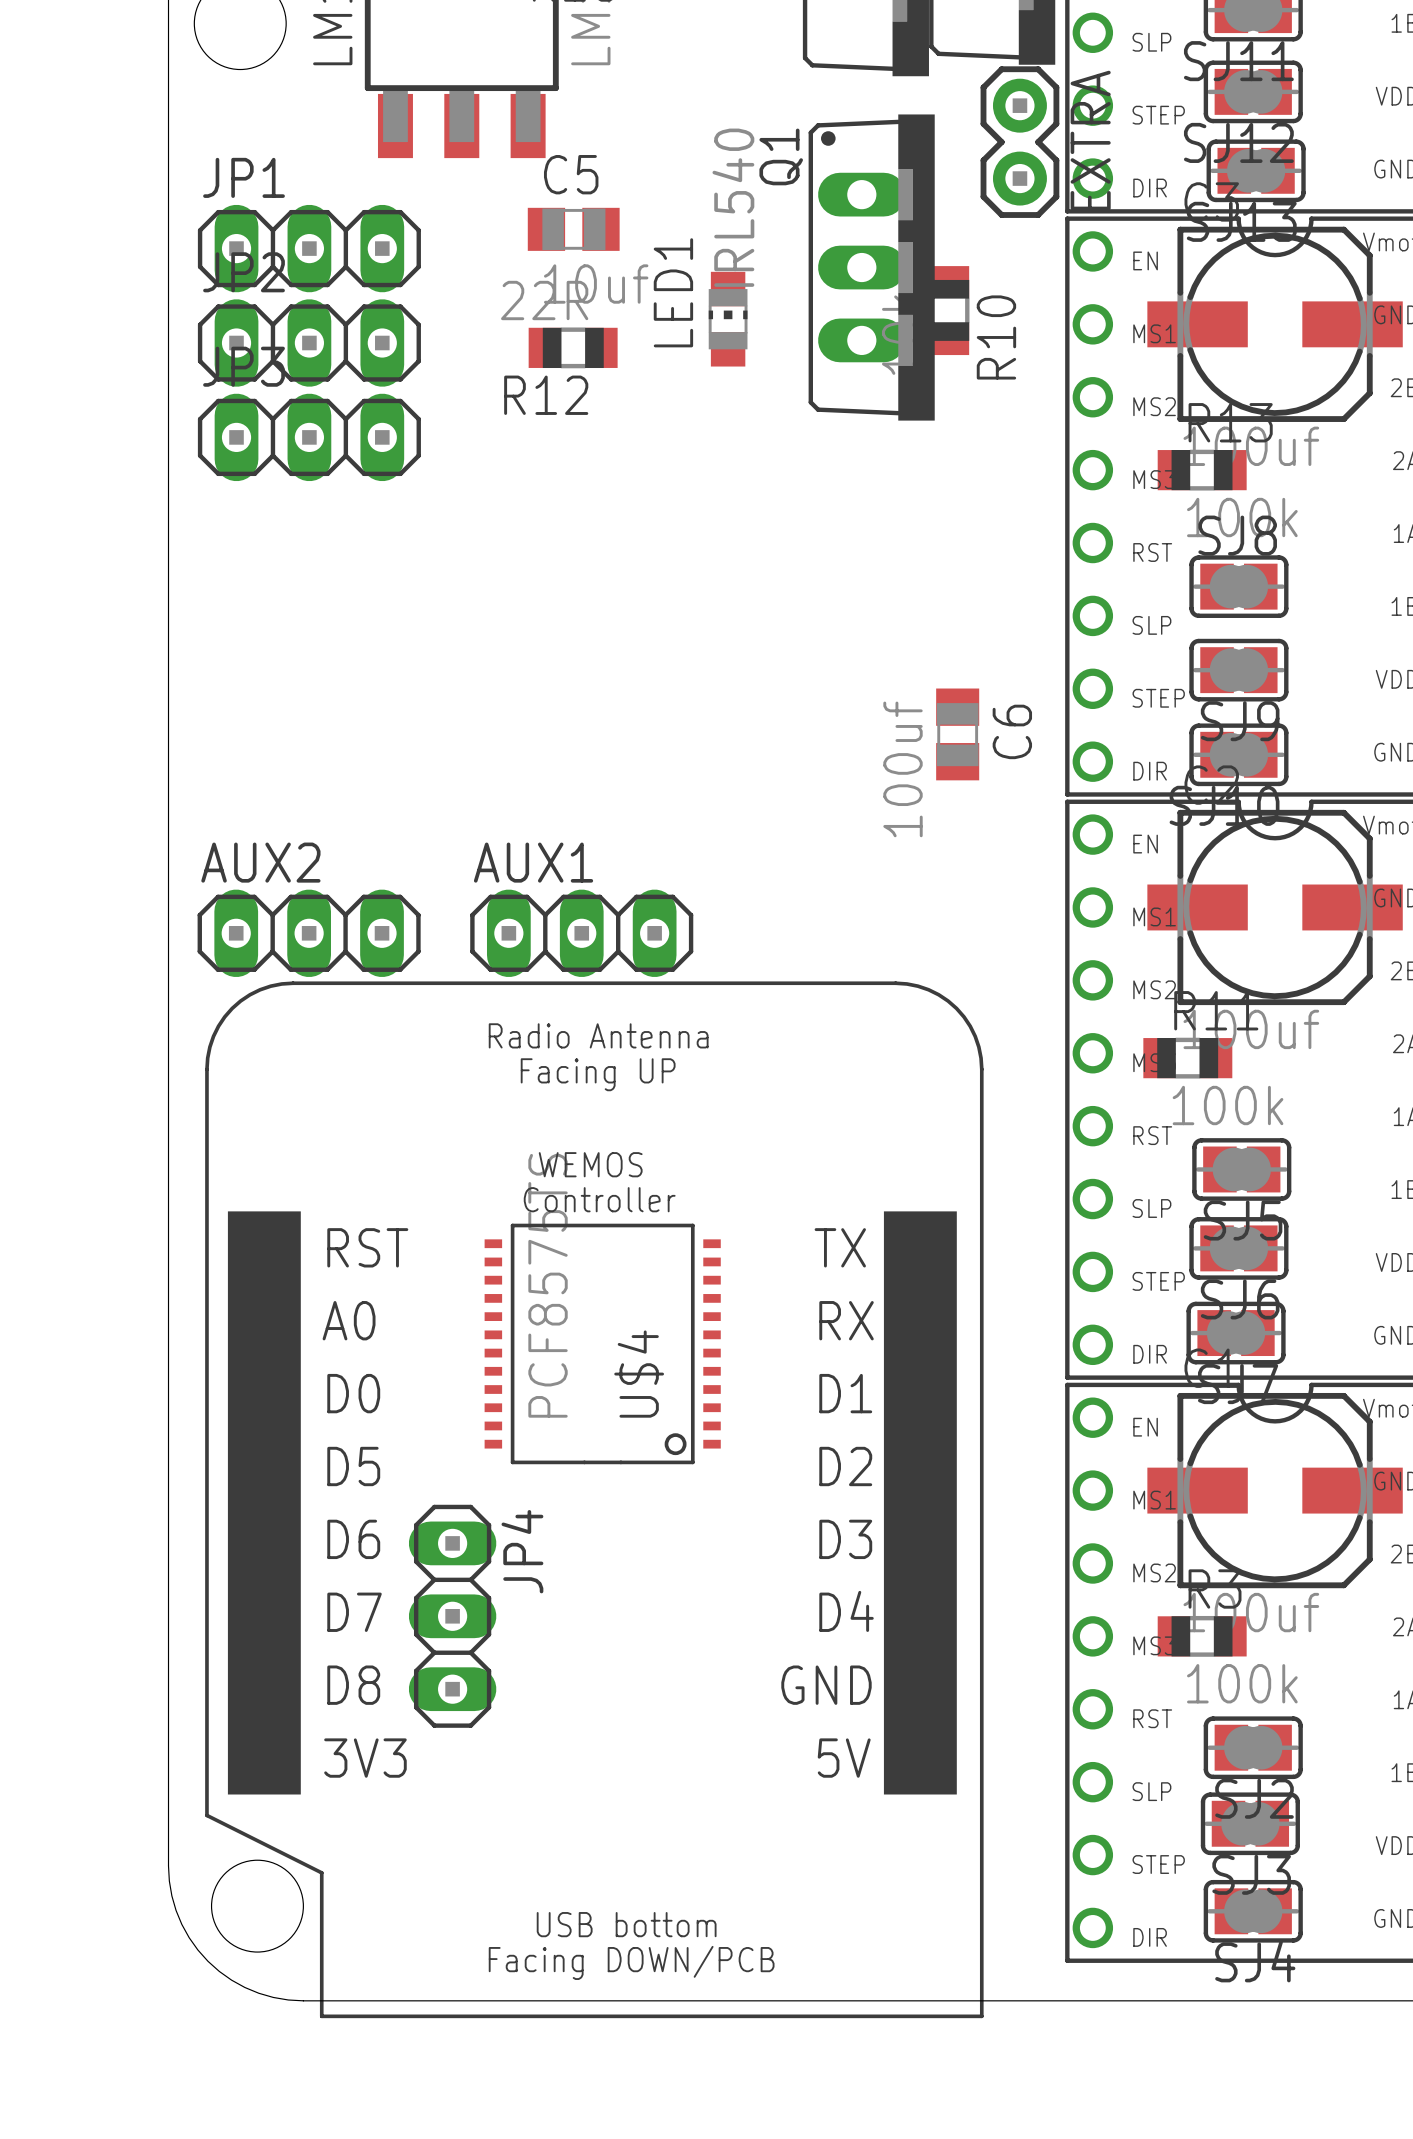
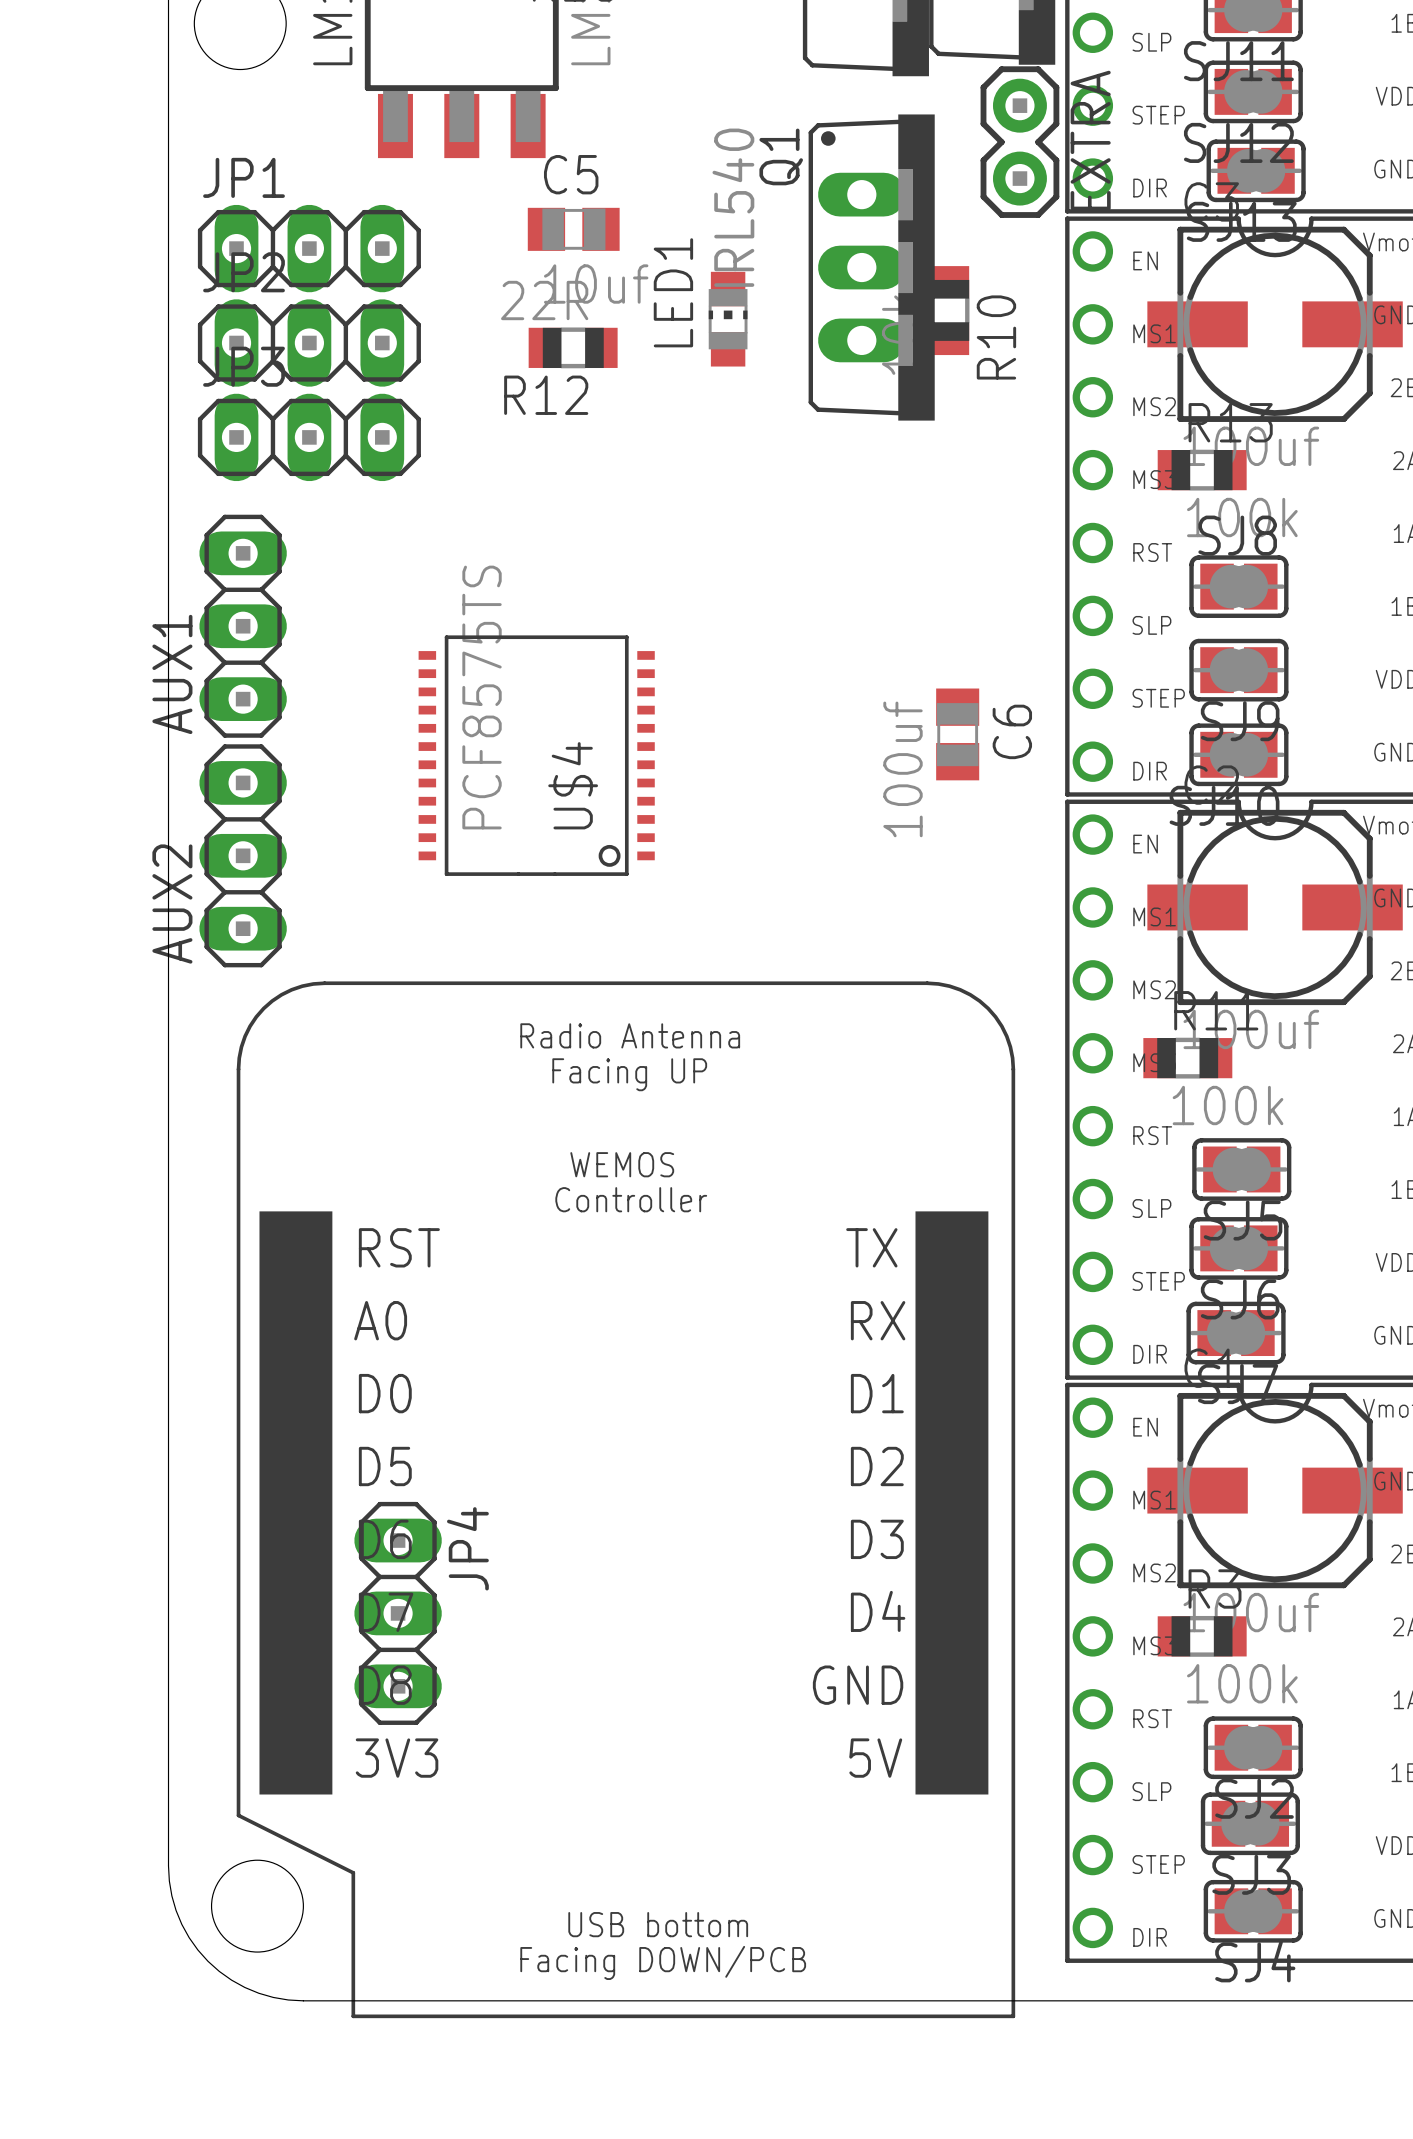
AUX2 name position: AUX2 (260, 862) -> AUX2 (172, 904)
AUX1 name position: AUX1 (533, 862) -> AUX1 (172, 674)
AUX2 rotation: 0° (309, 933) -> 90° clockwise (243, 855)
AUX1 rotation: 0° (581, 933) -> 90° clockwise (243, 626)
AUX1 position: (581, 933) -> (243, 626)
U$4 position: (602, 1343) -> (536, 755)
part position: (594, 1499) -> (625, 1499)
JP4 position: (452, 1616) -> (398, 1613)

